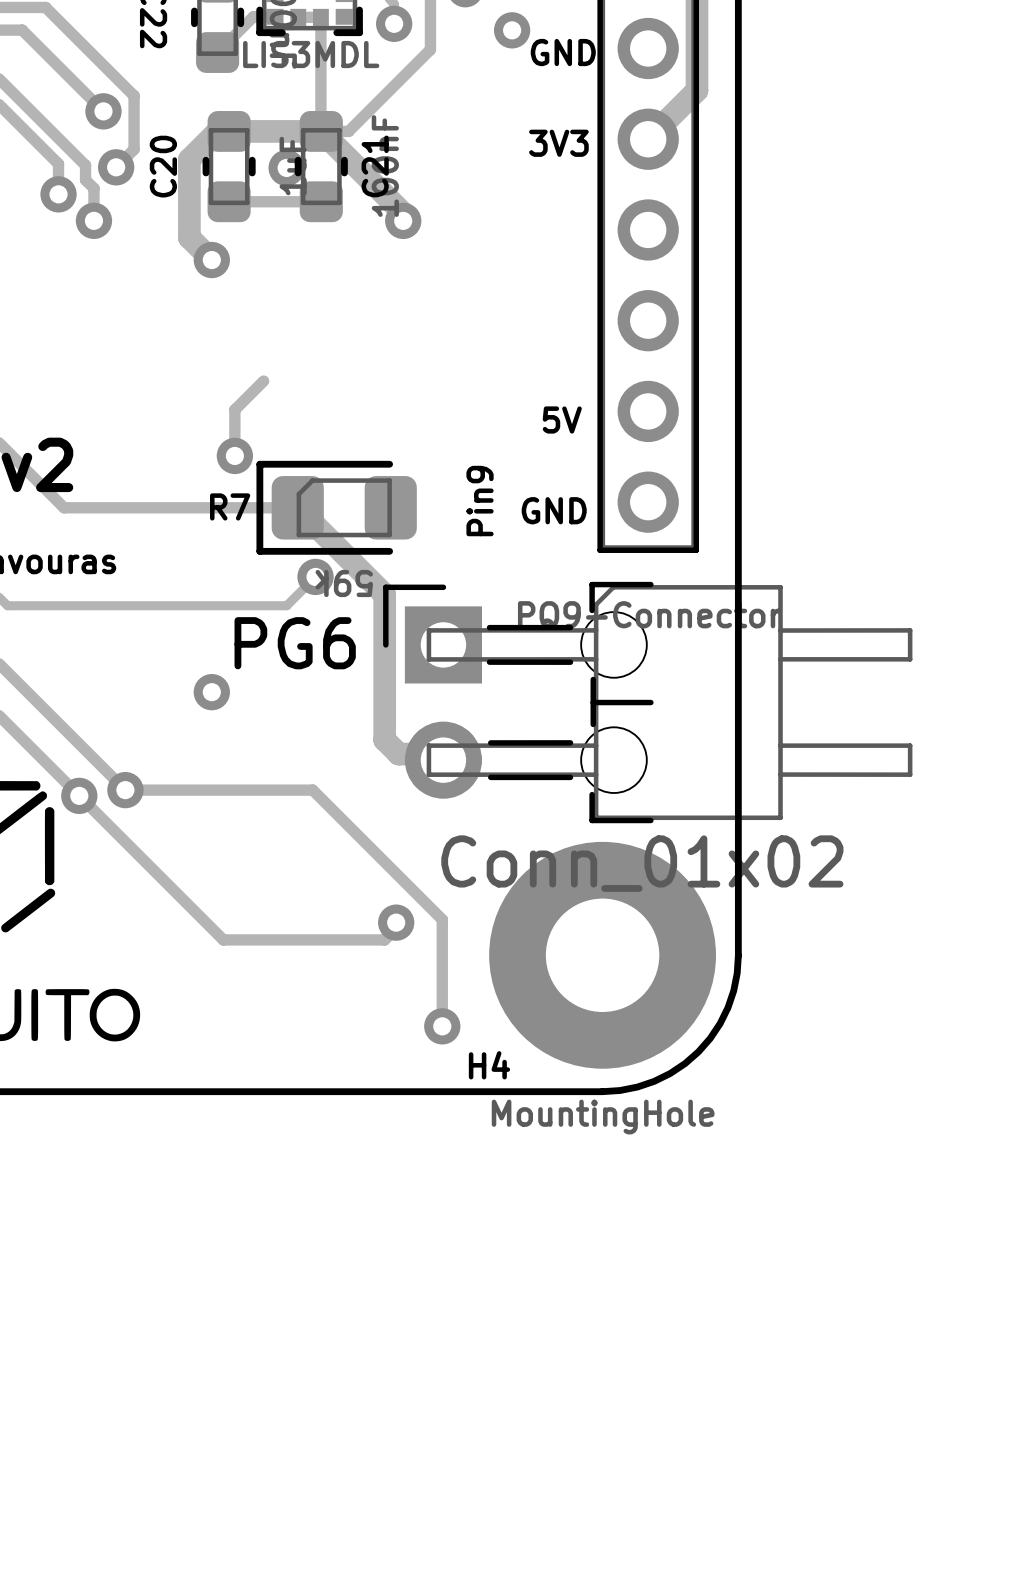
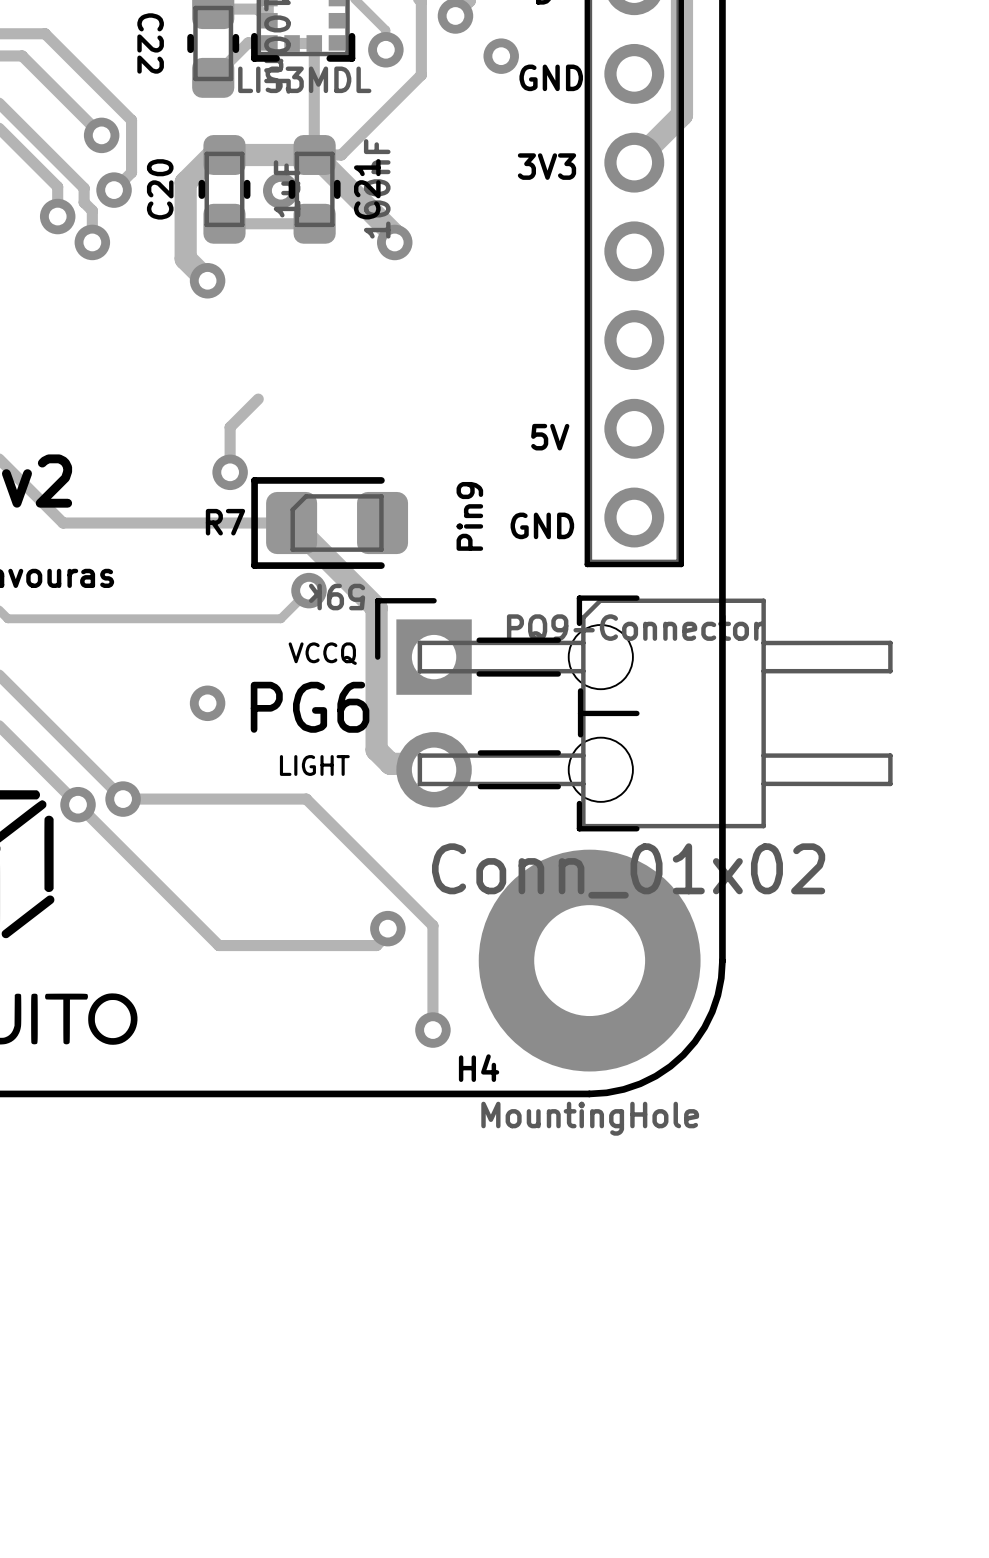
text: none -> VCCQ (322, 653)
PG6 name position: PG6 (295, 643) -> PG6 (310, 707)
text: none -> LIGHT (314, 765)

